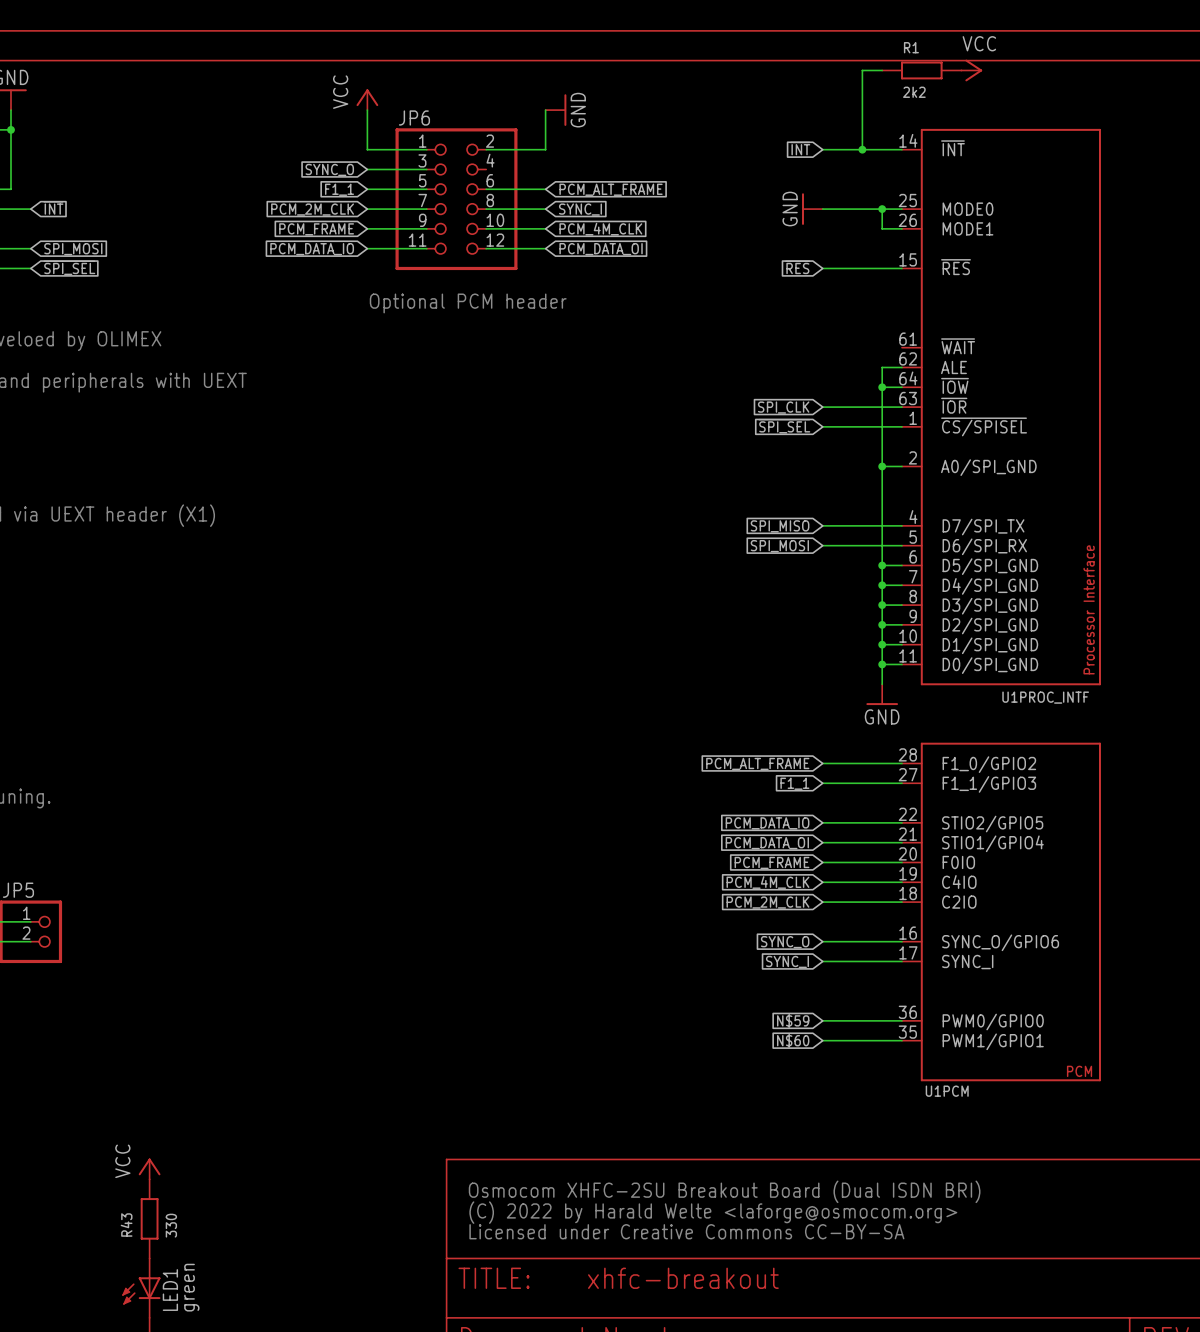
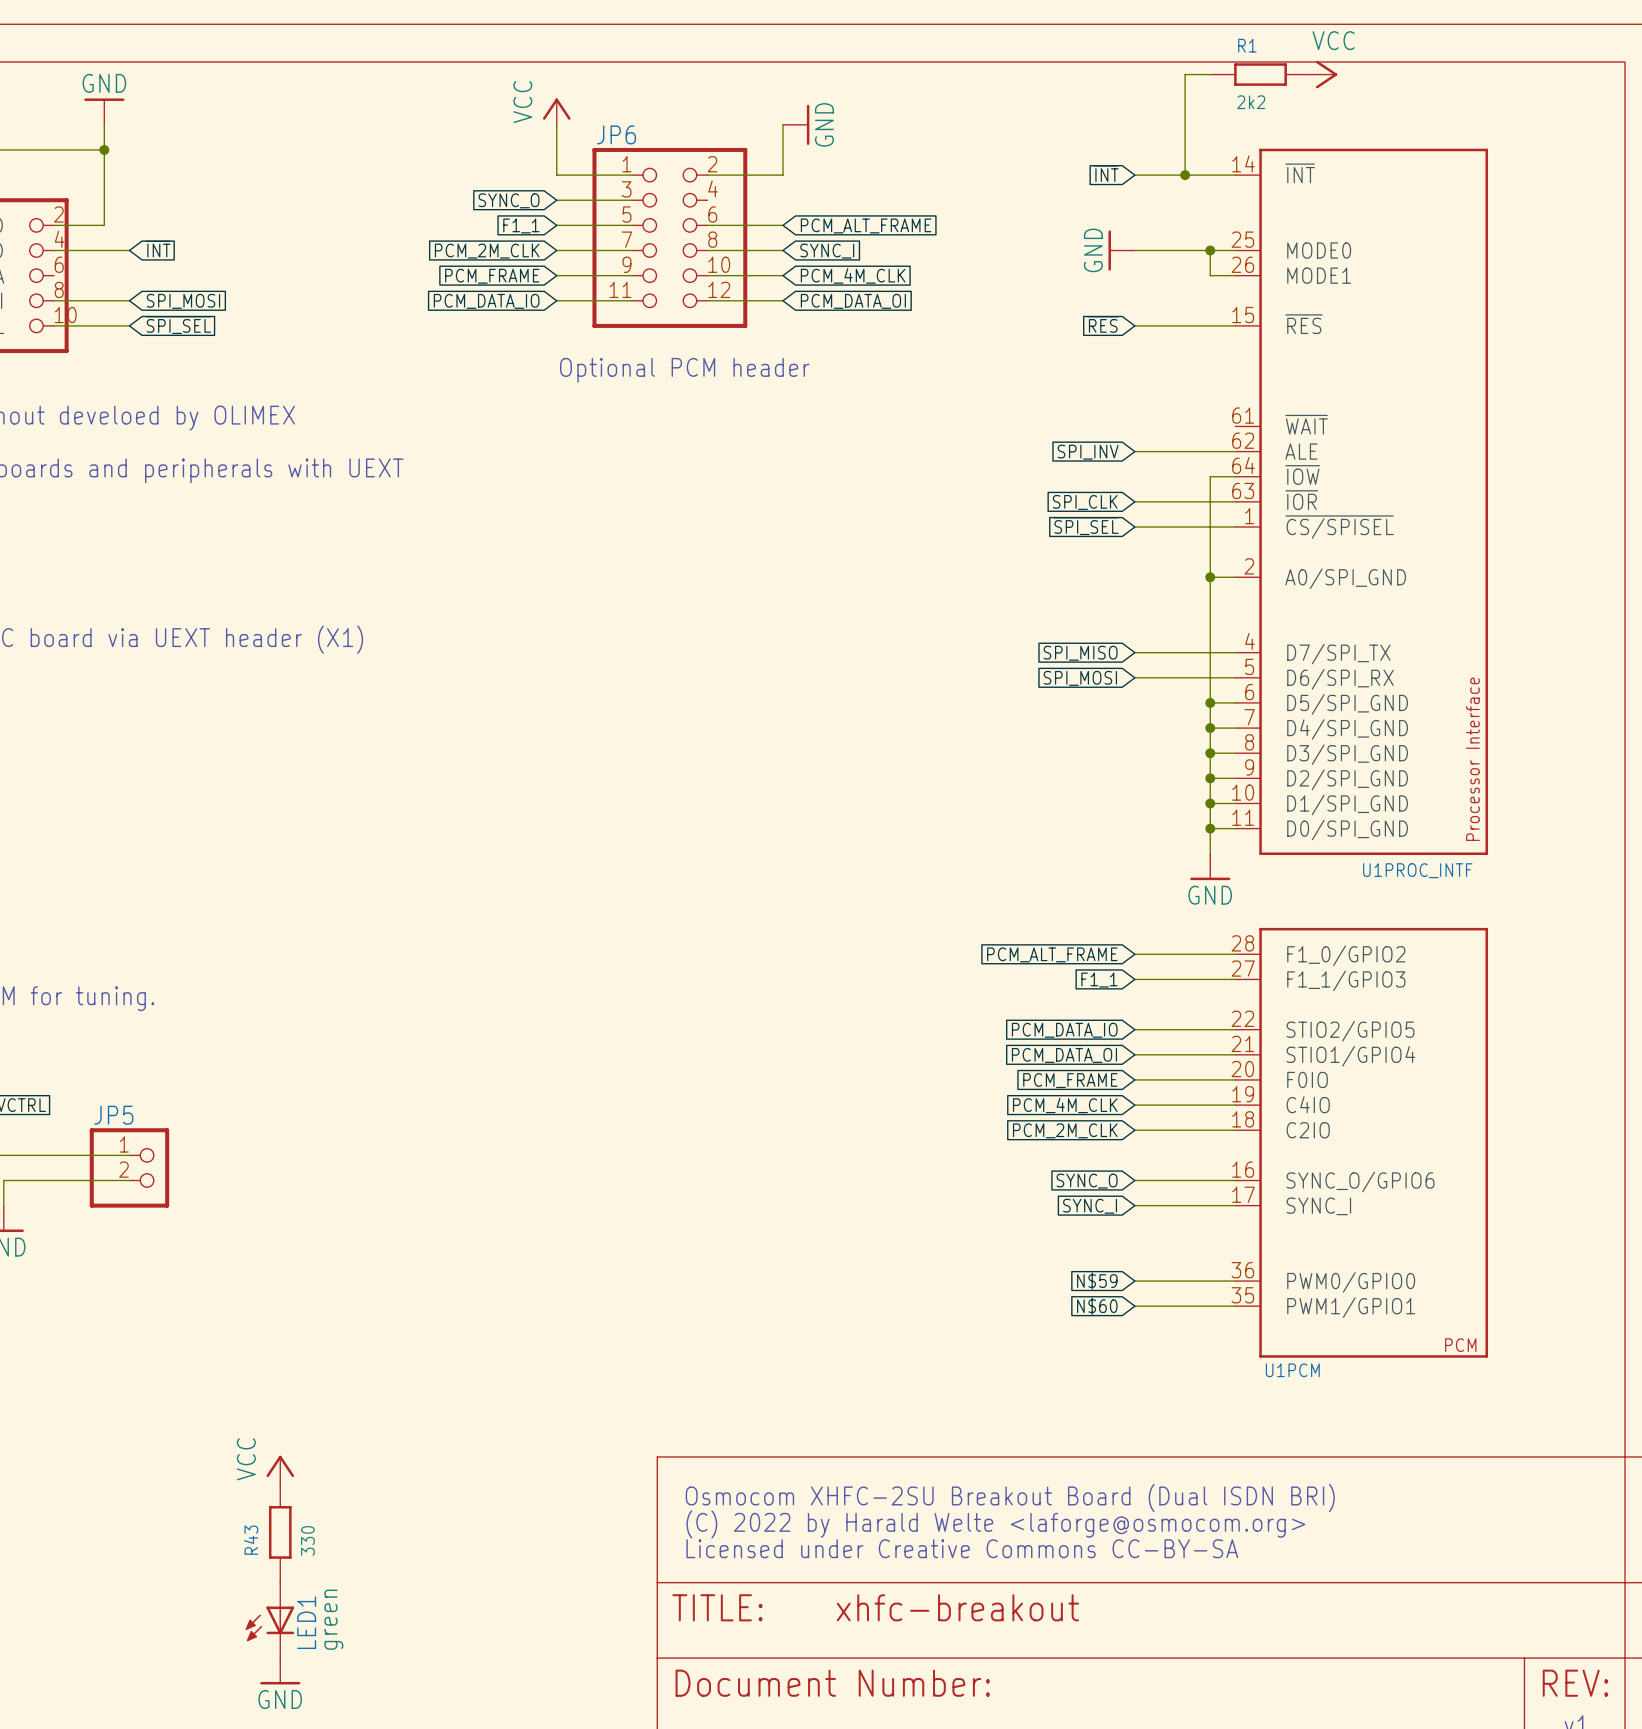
global label: none -> SPI_INV (1088, 452)
wire: (882, 367) (882, 387) -> (1210, 451) (1134, 451)
junction: (882, 387) -> none

